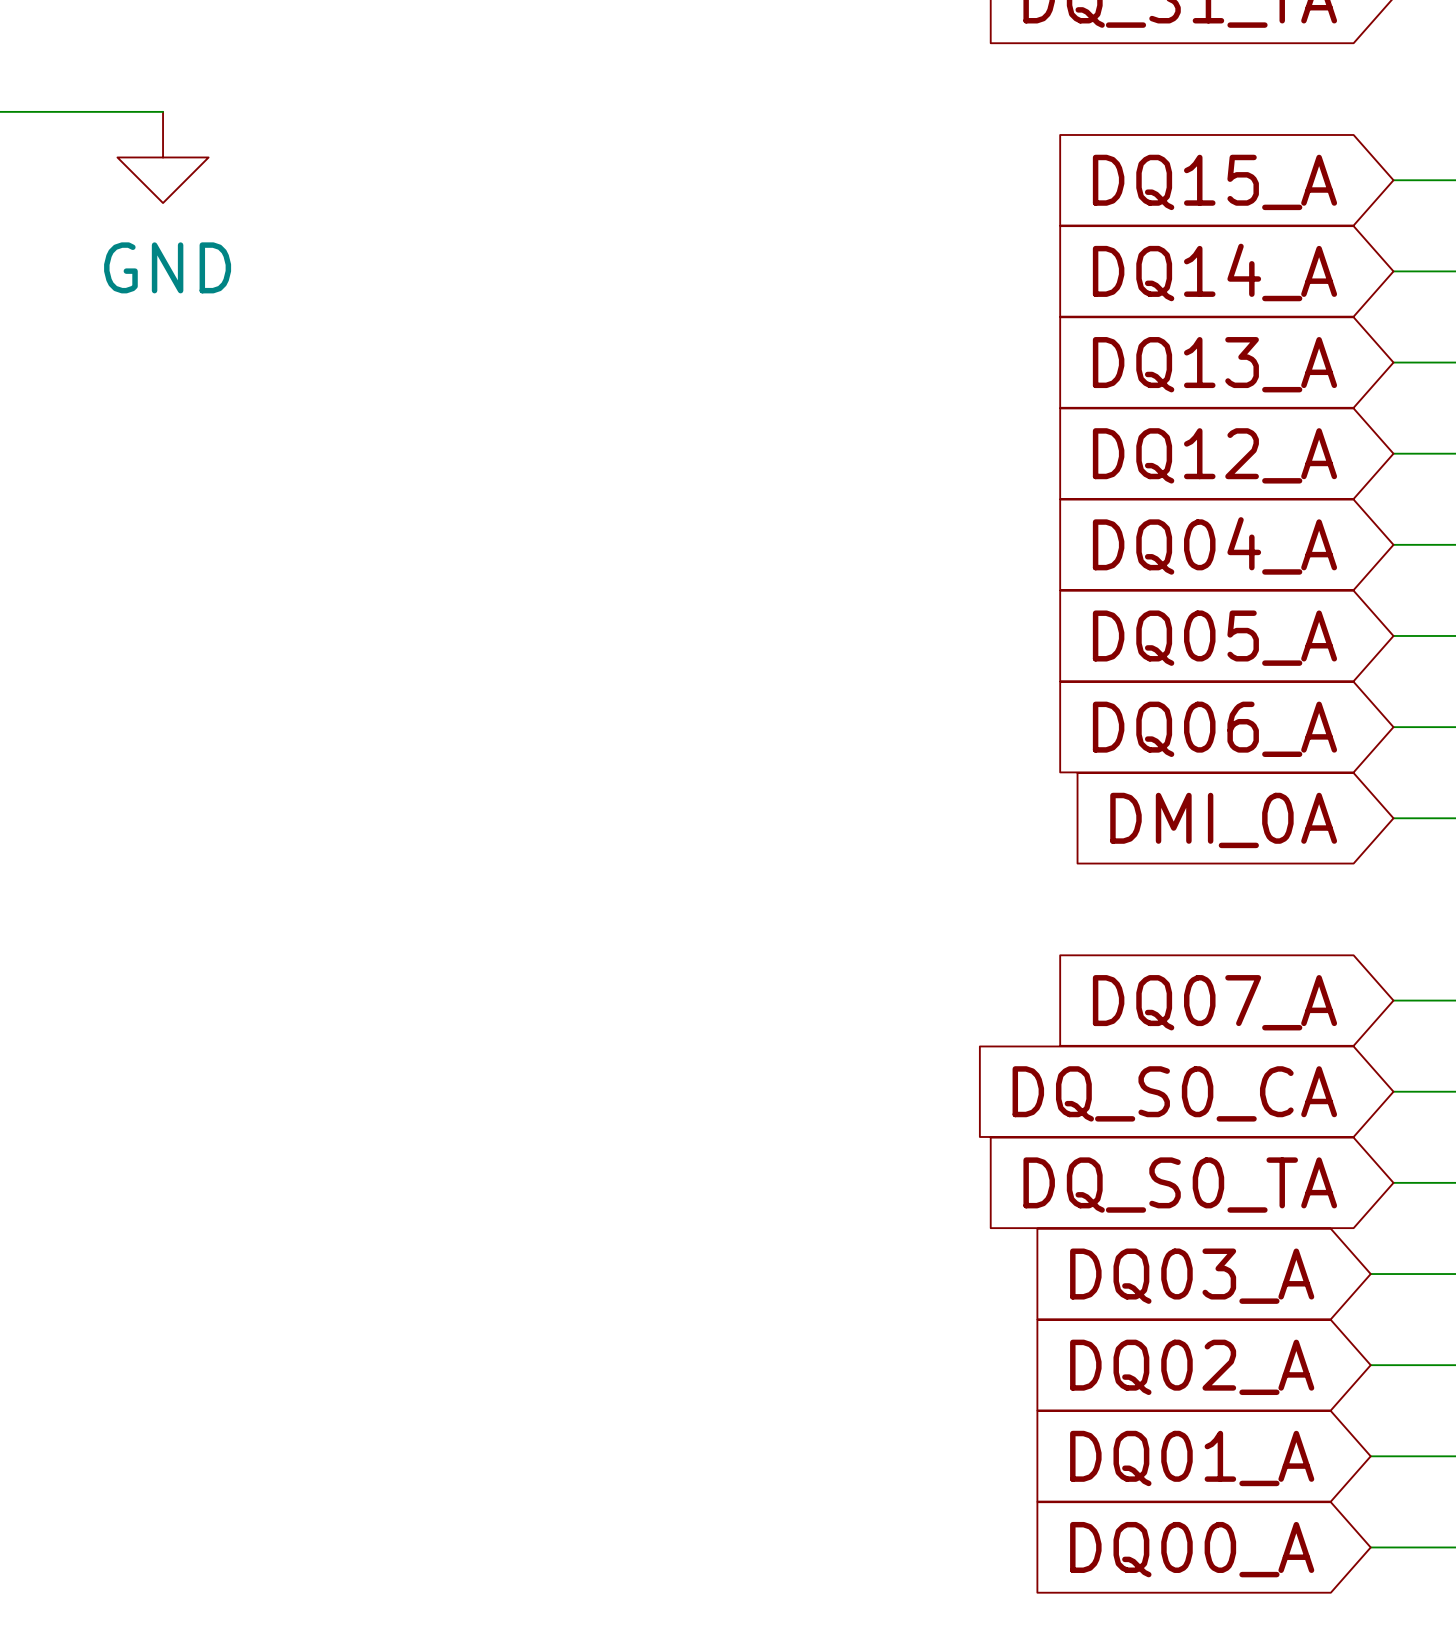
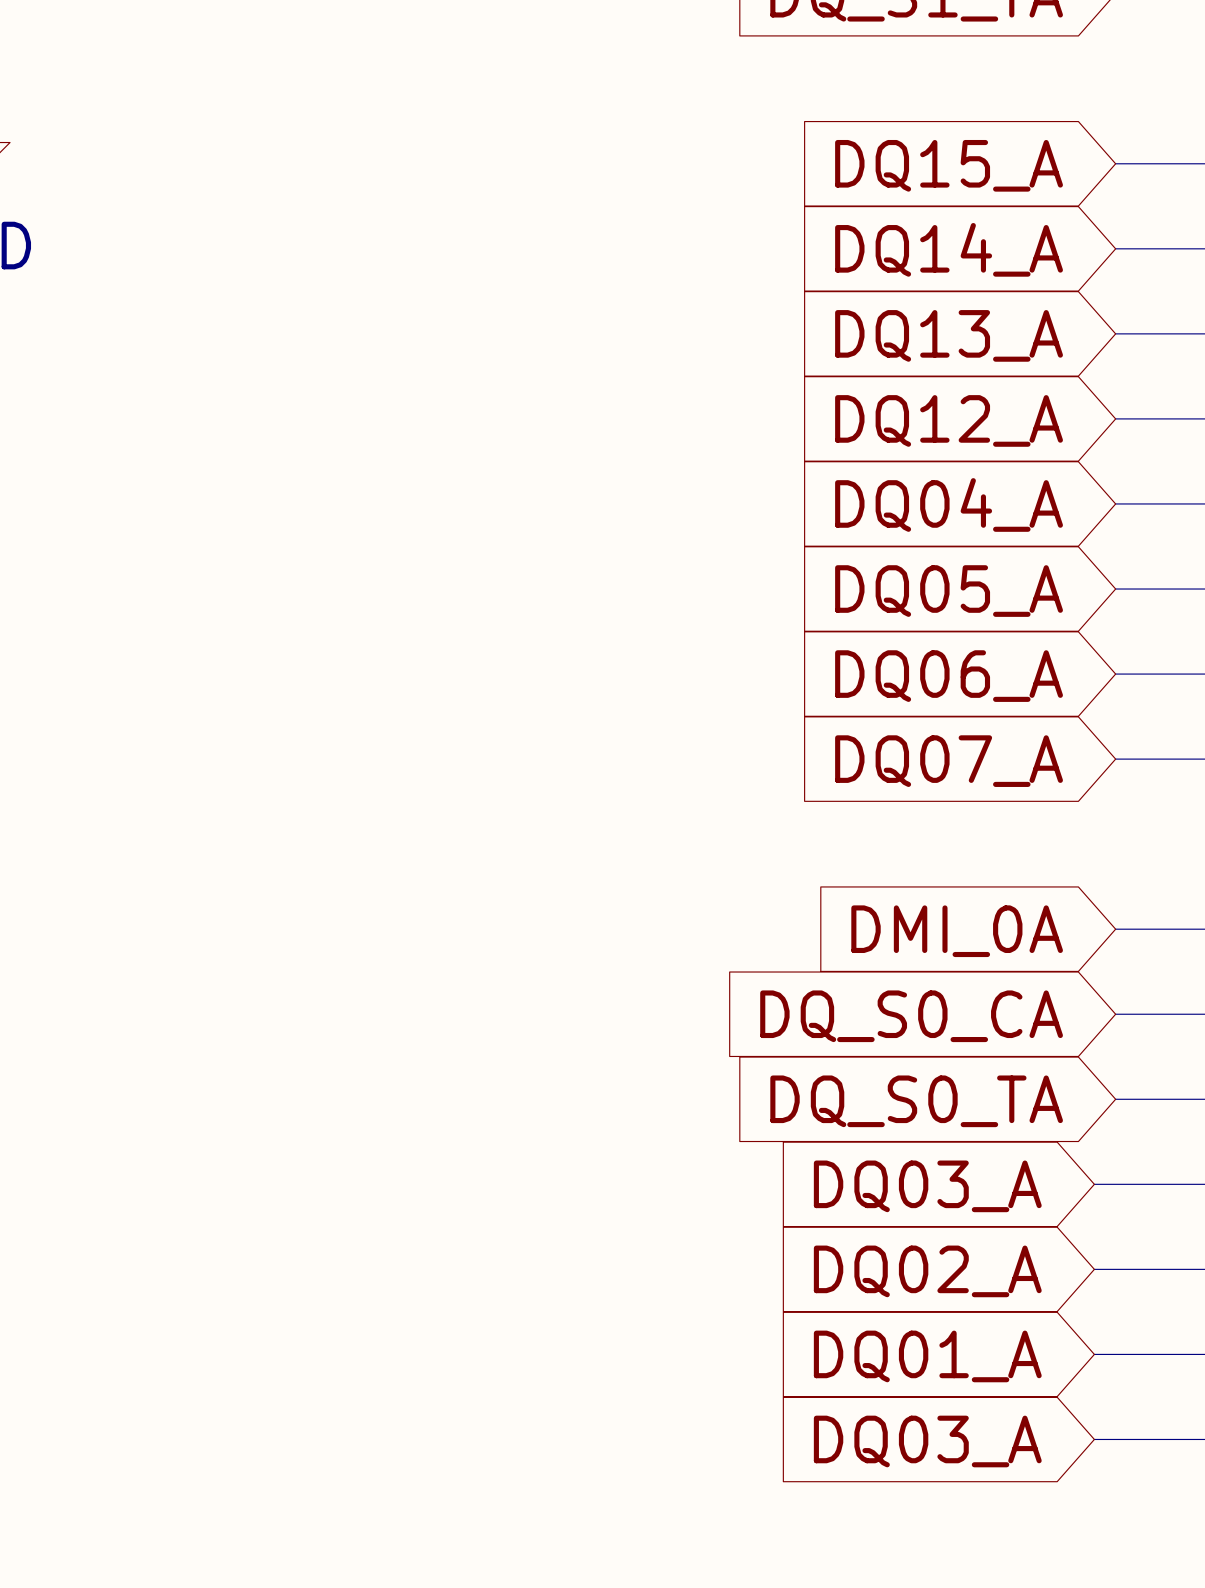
global label: DMI_0A (1223, 820) -> DQ07_A (949, 761)
global label: DQ07_A (1214, 1002) -> DMI_0A (957, 931)
global label: DQ00_A (1192, 1549) -> DQ03_A (927, 1441)

